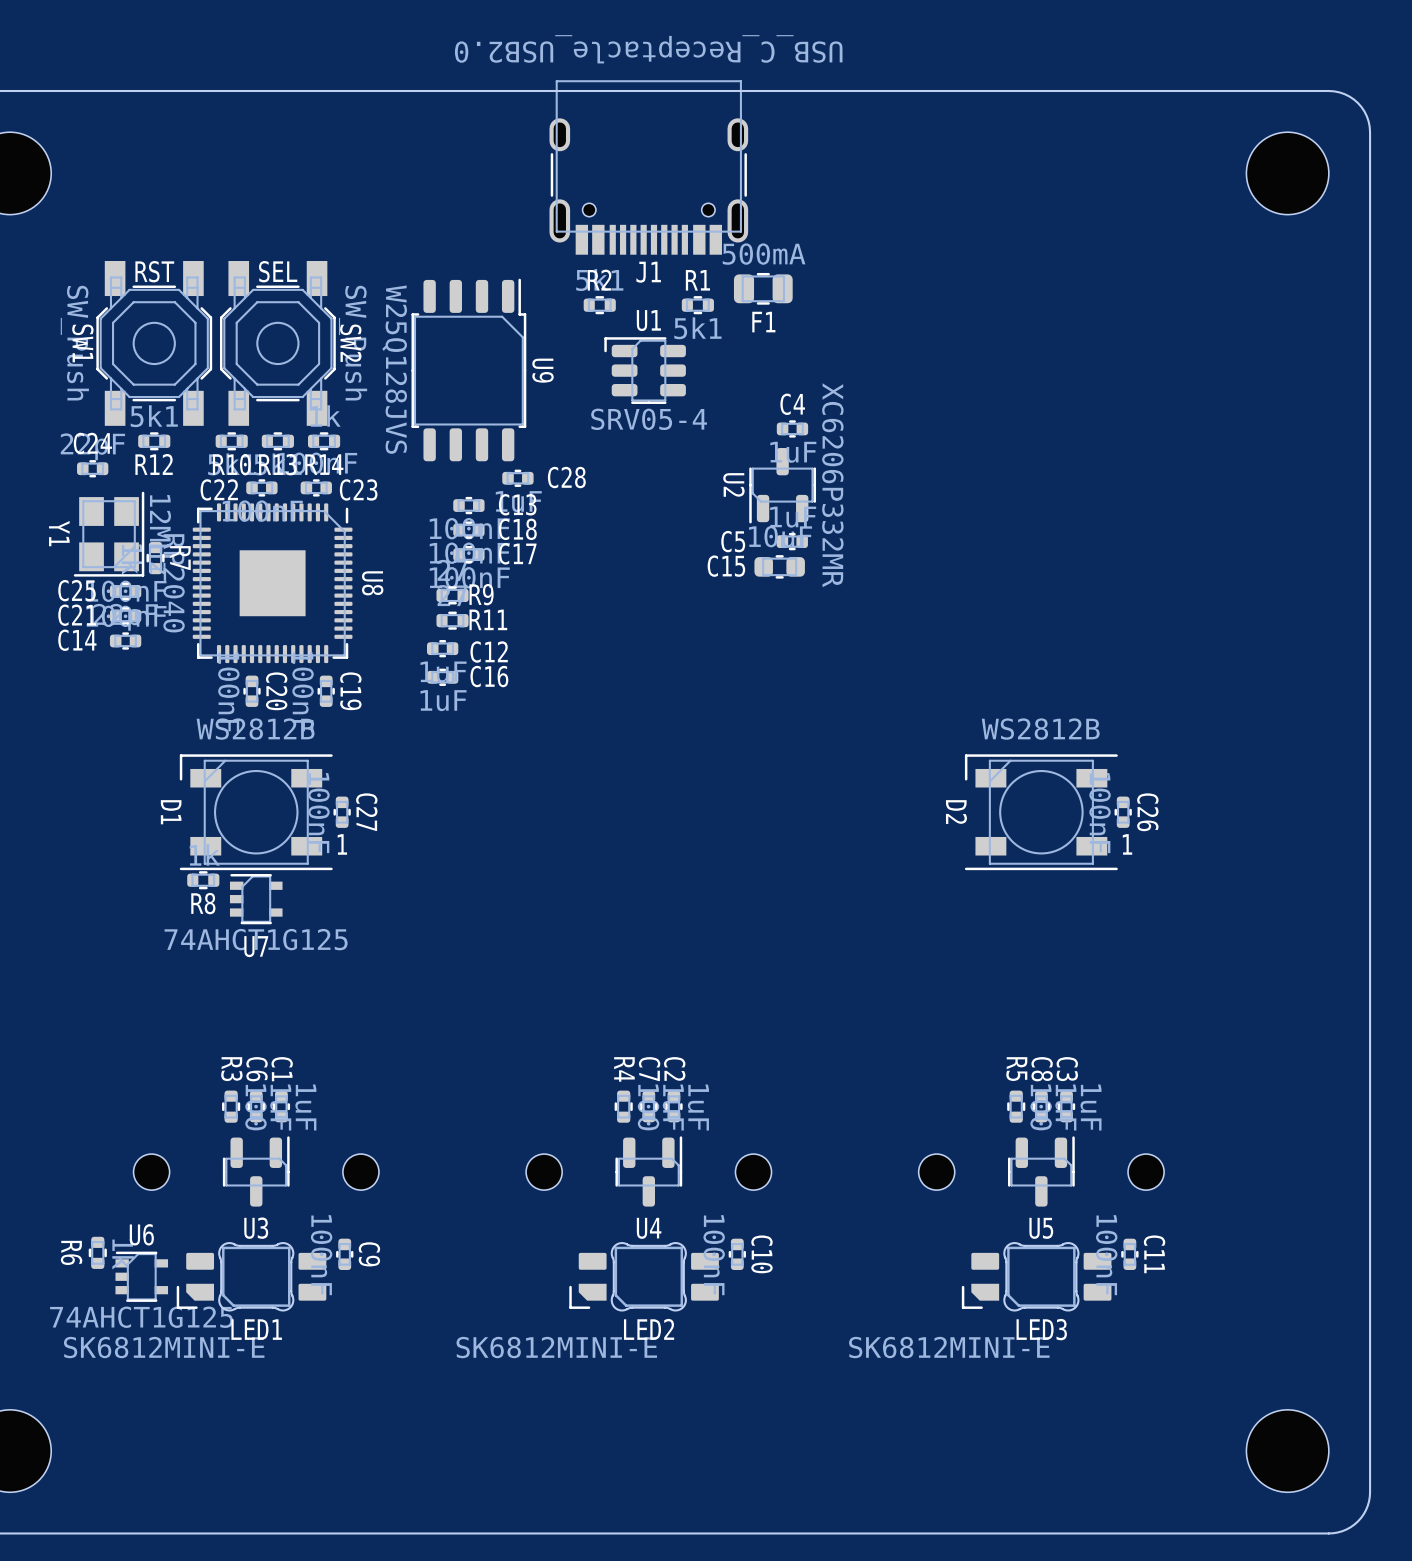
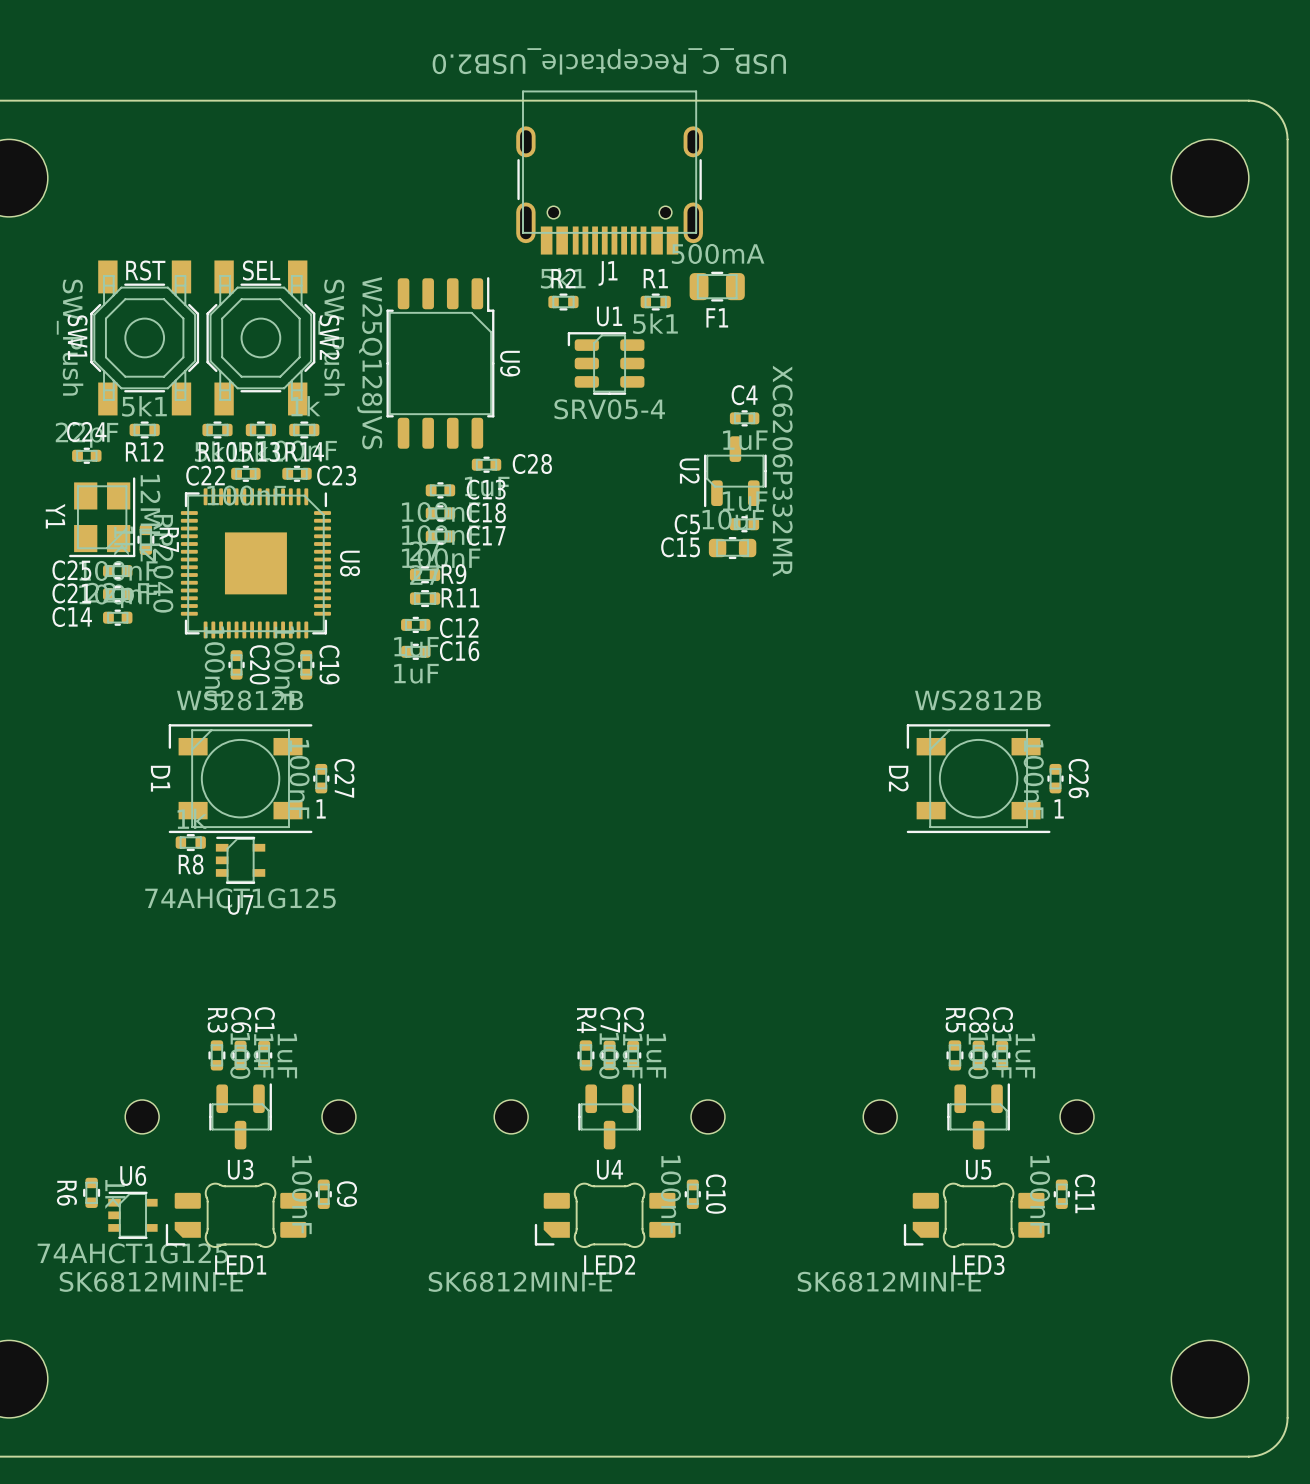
LED1 footprint: [176, 1242, 327, 1312] -> [165, 1182, 307, 1248]
LED2 footprint: [569, 1242, 719, 1312] -> [534, 1182, 676, 1248]
LED3 footprint: [961, 1242, 1112, 1312] -> [903, 1182, 1045, 1248]

